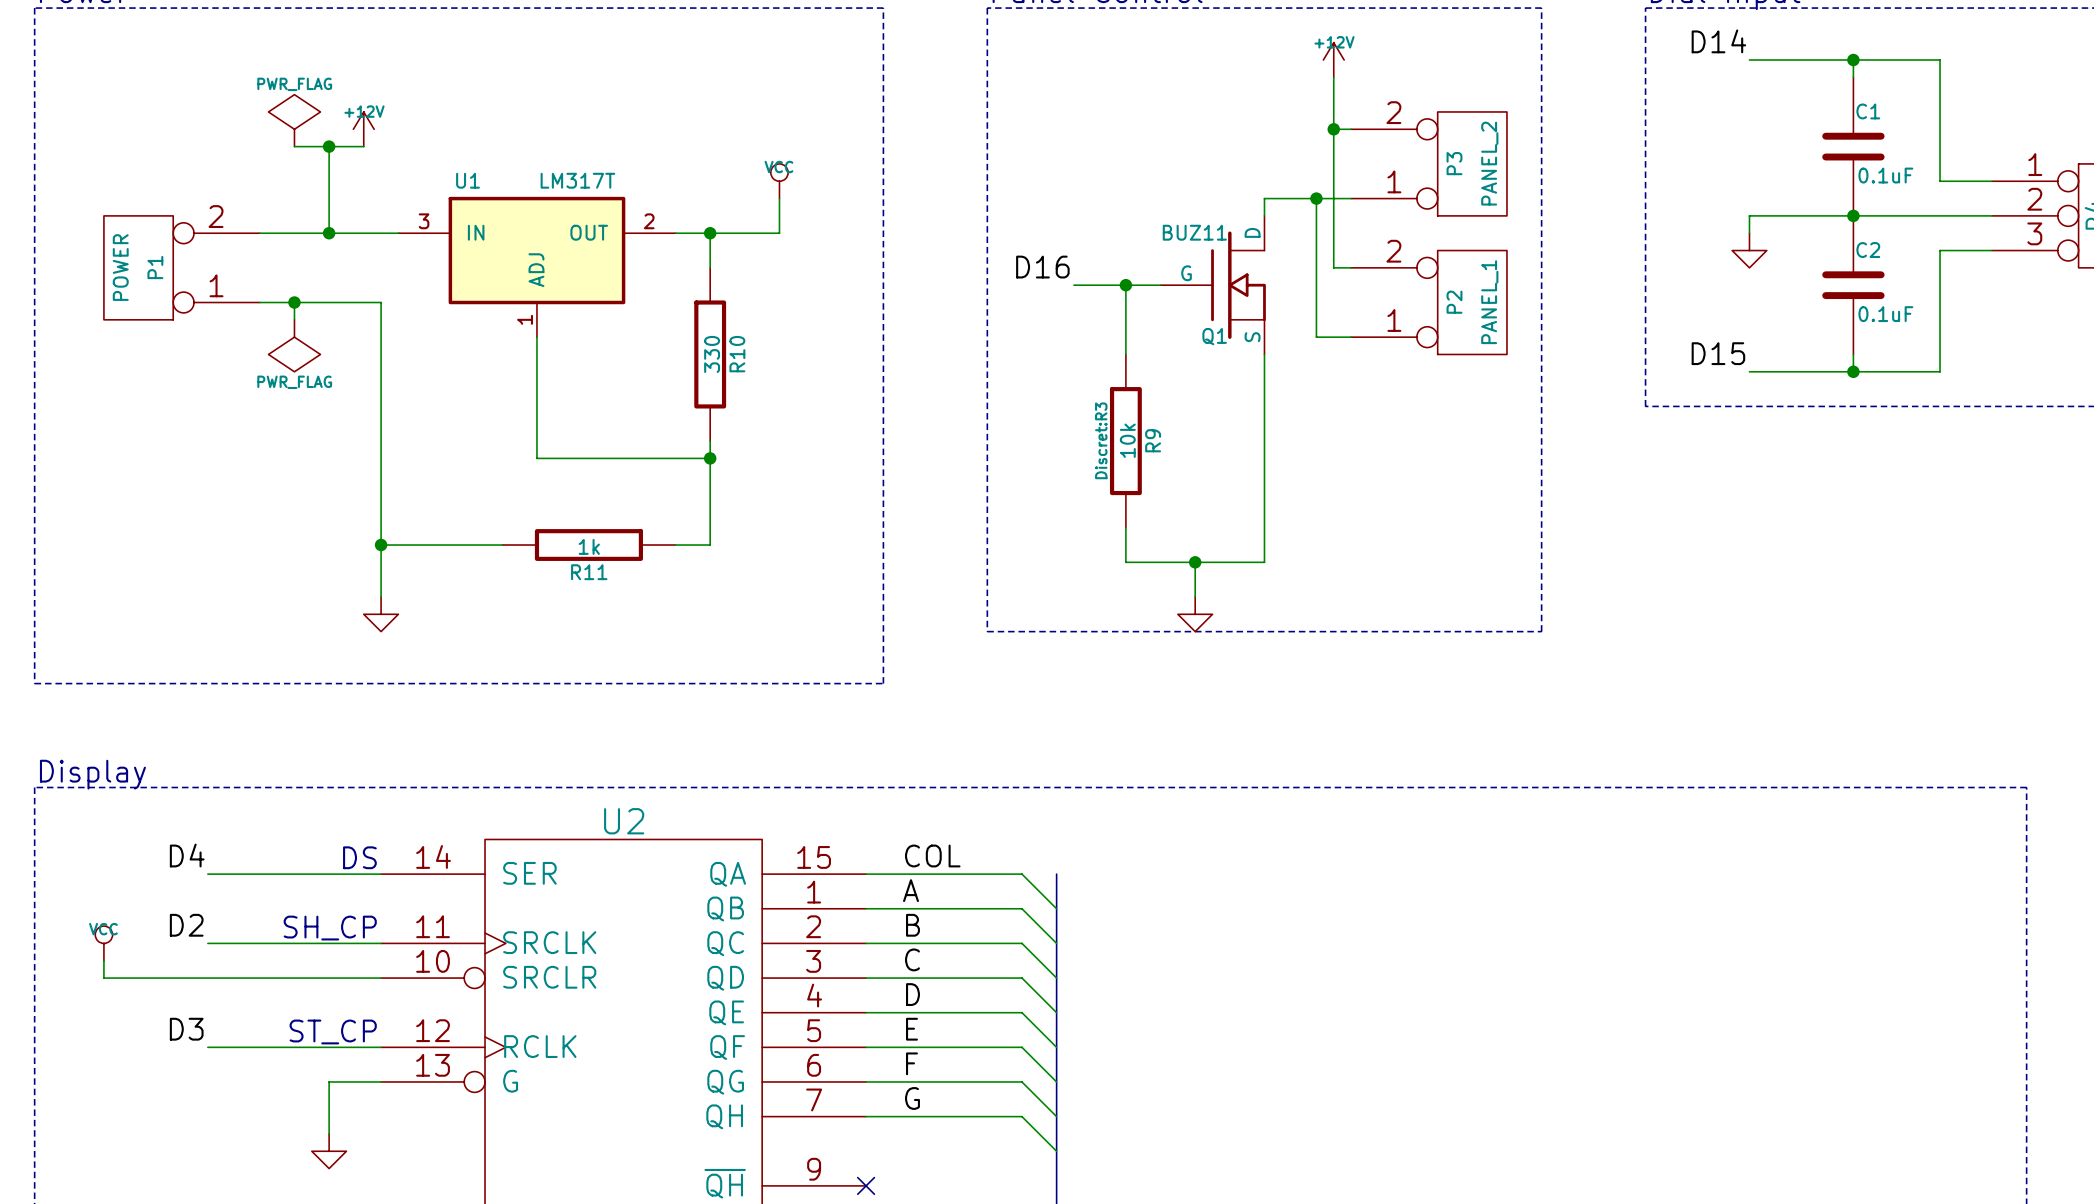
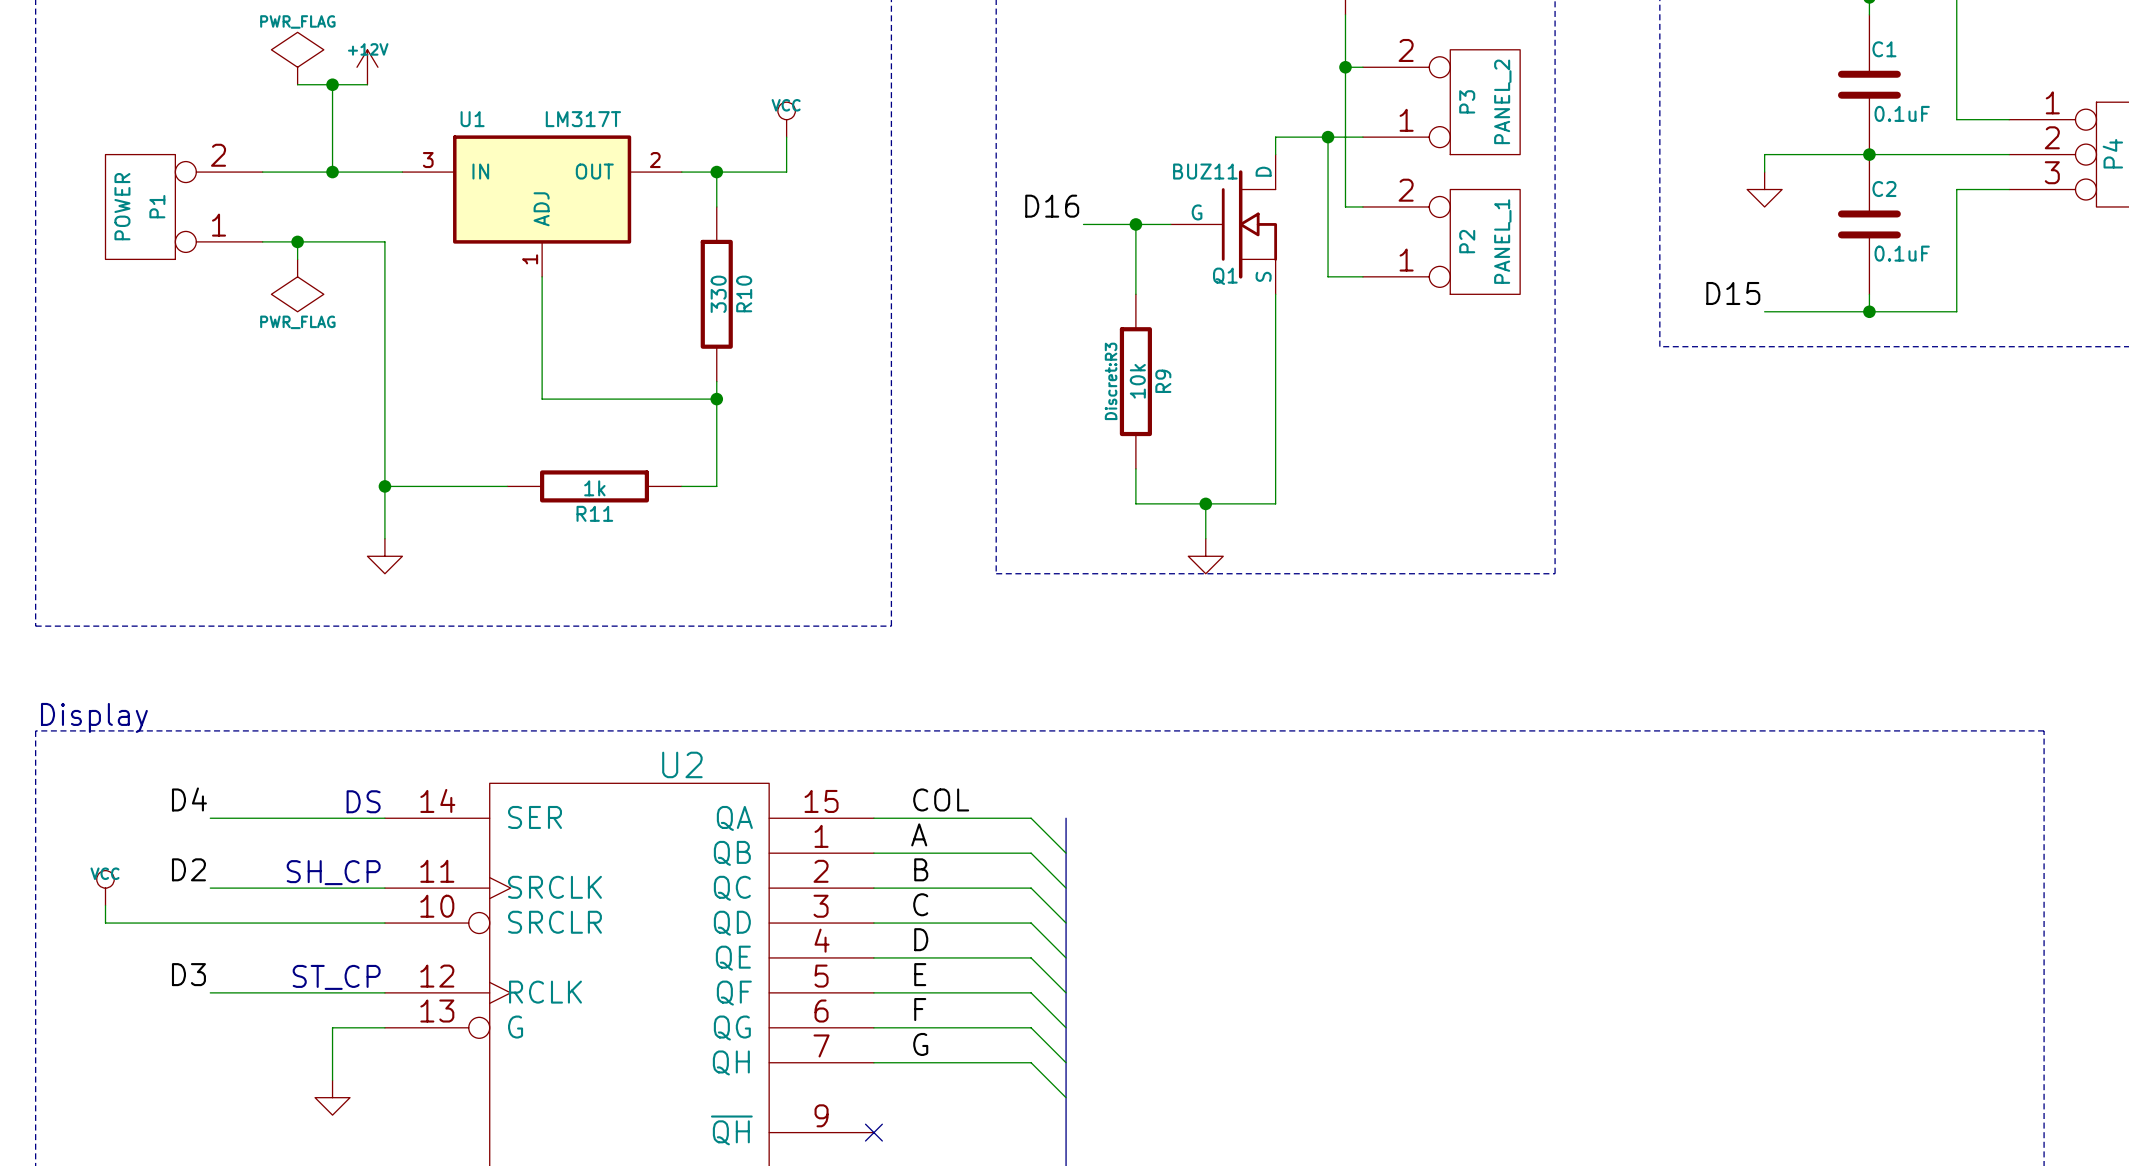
U2 name position: U2 (624, 821) -> U2 (682, 764)

